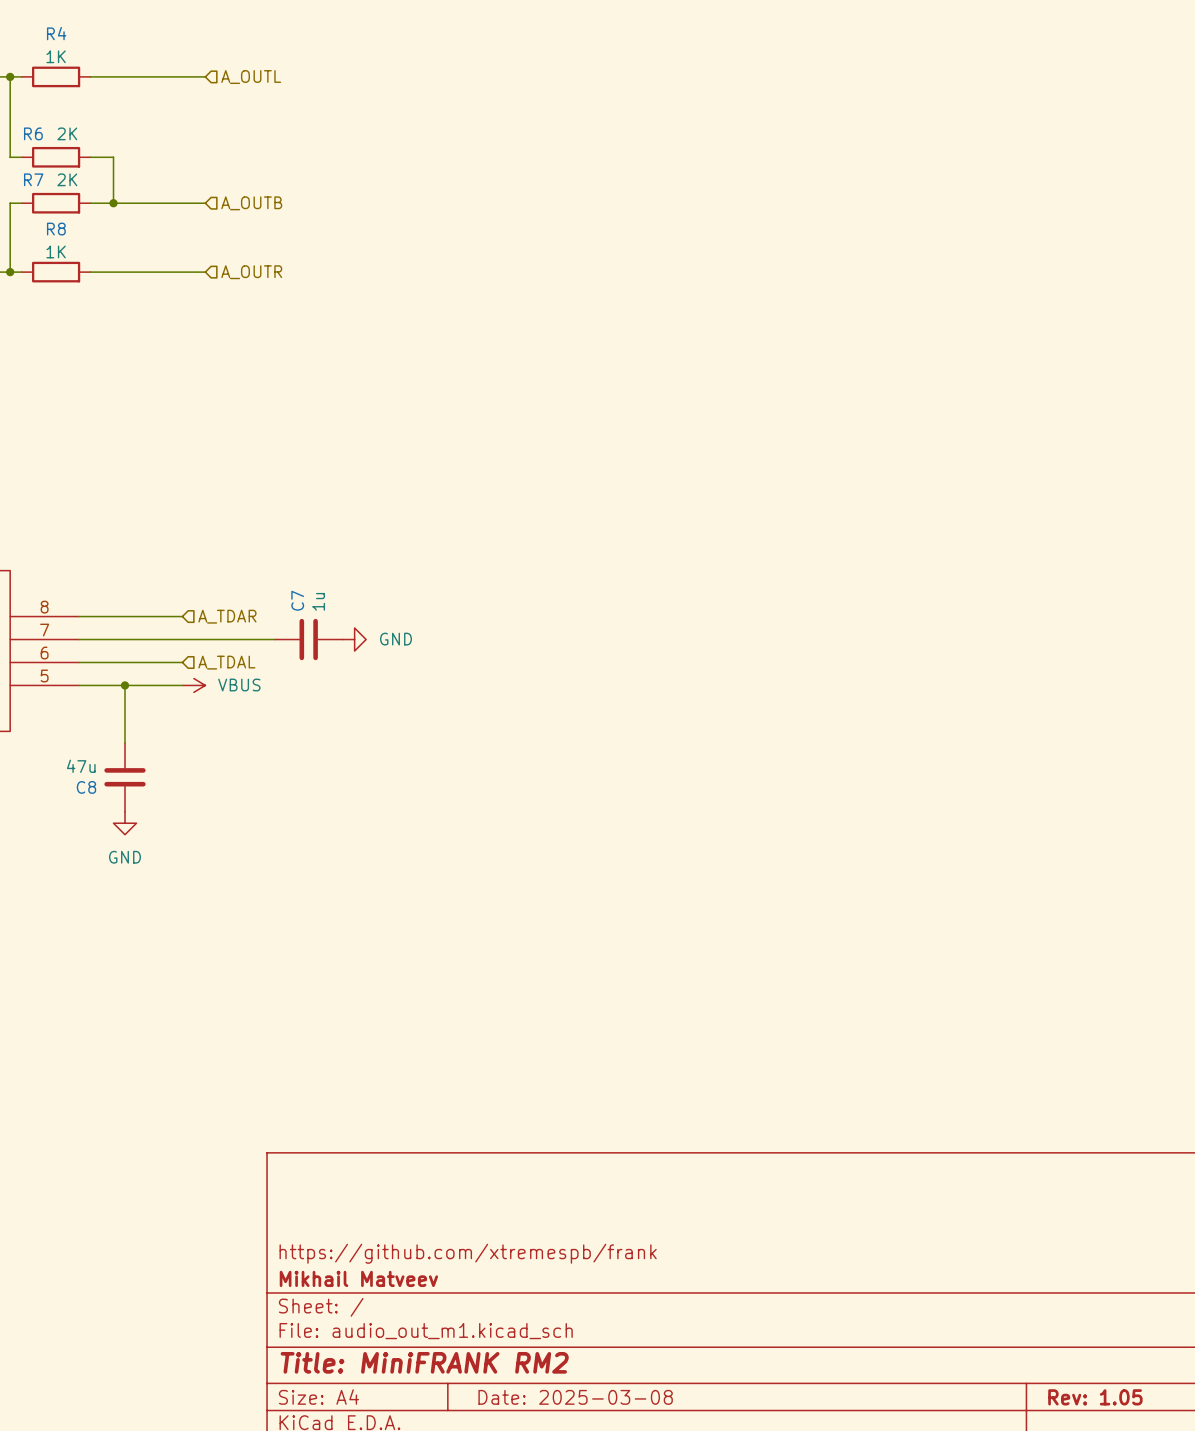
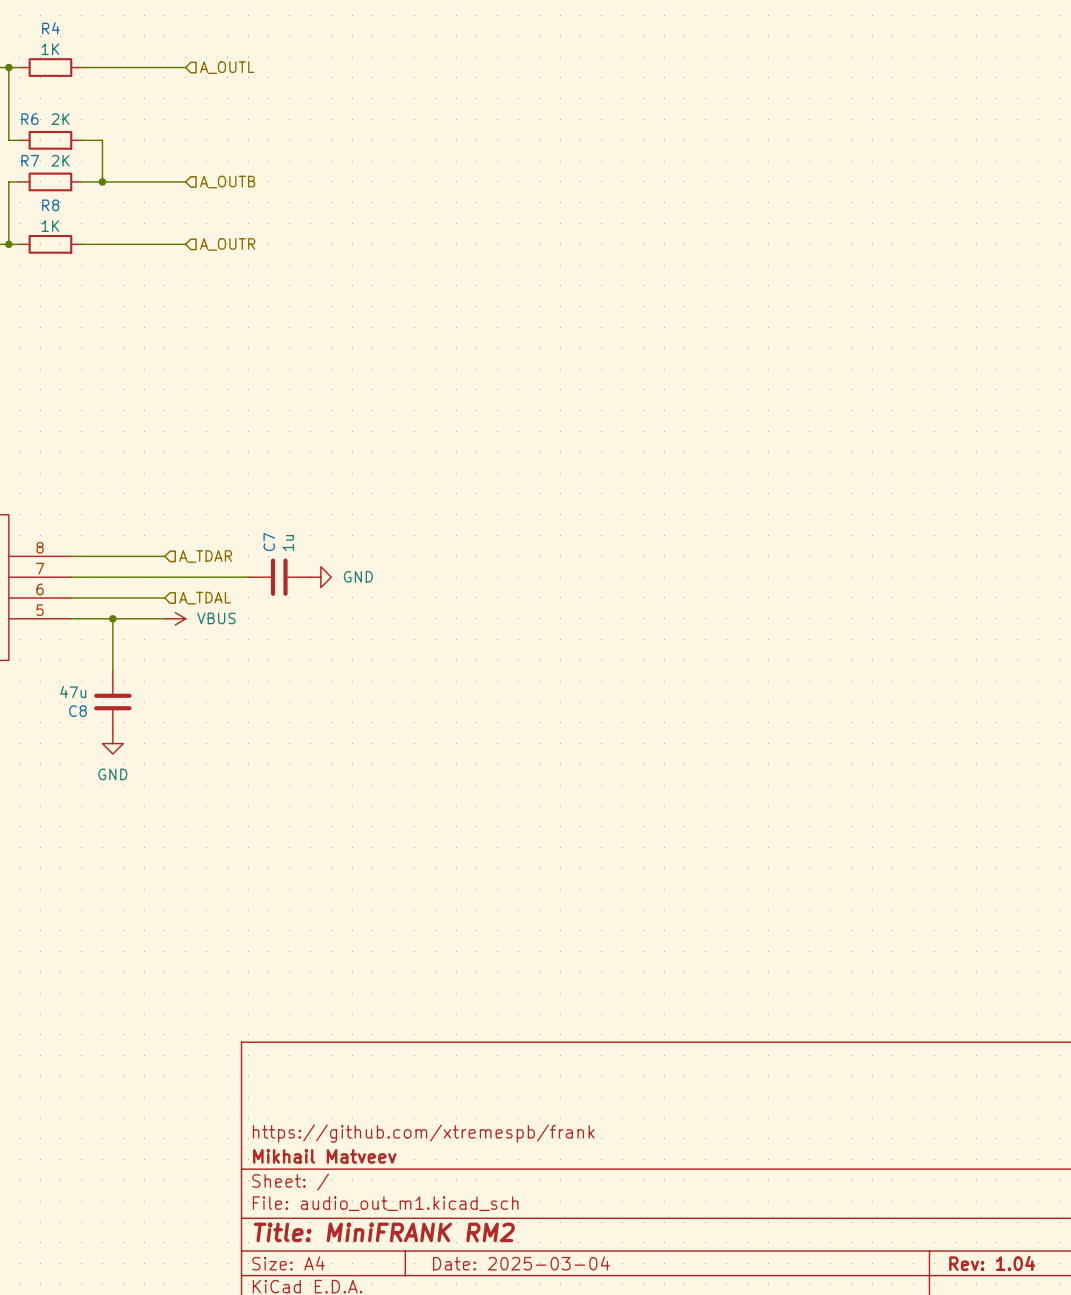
title block: Date: 2025-03-08 (575, 1397) -> Date: 2025-03-04 (521, 1263)
title block: Rev: 1.05 (1095, 1397) -> Rev: 1.04 (992, 1263)

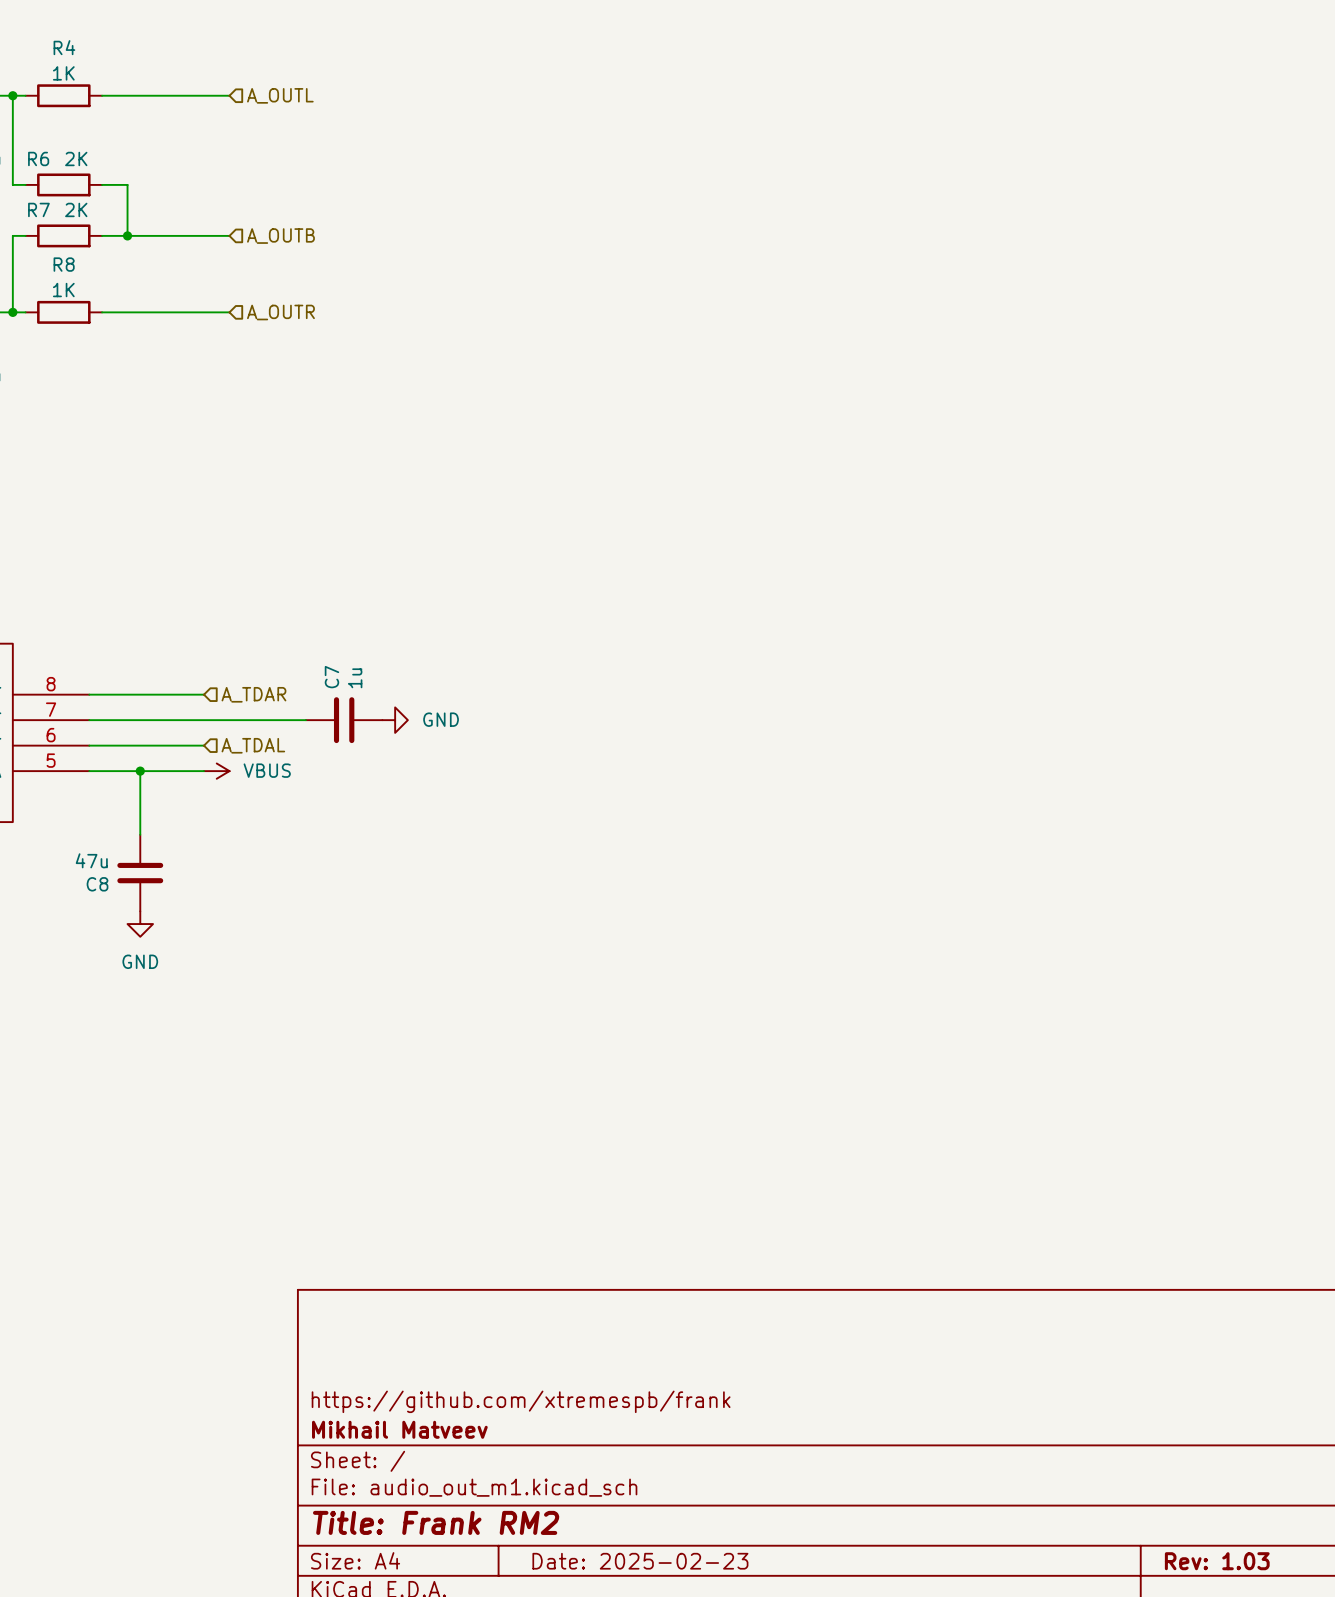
title block: Title: MiniFRANK RM2 (384, 1232) -> Title: Frank RM2 (436, 1522)
title block: Date: 2025-03-04 (521, 1263) -> Date: 2025-02-23 (640, 1561)
title block: Rev: 1.04 (992, 1263) -> Rev: 1.03 (1217, 1561)

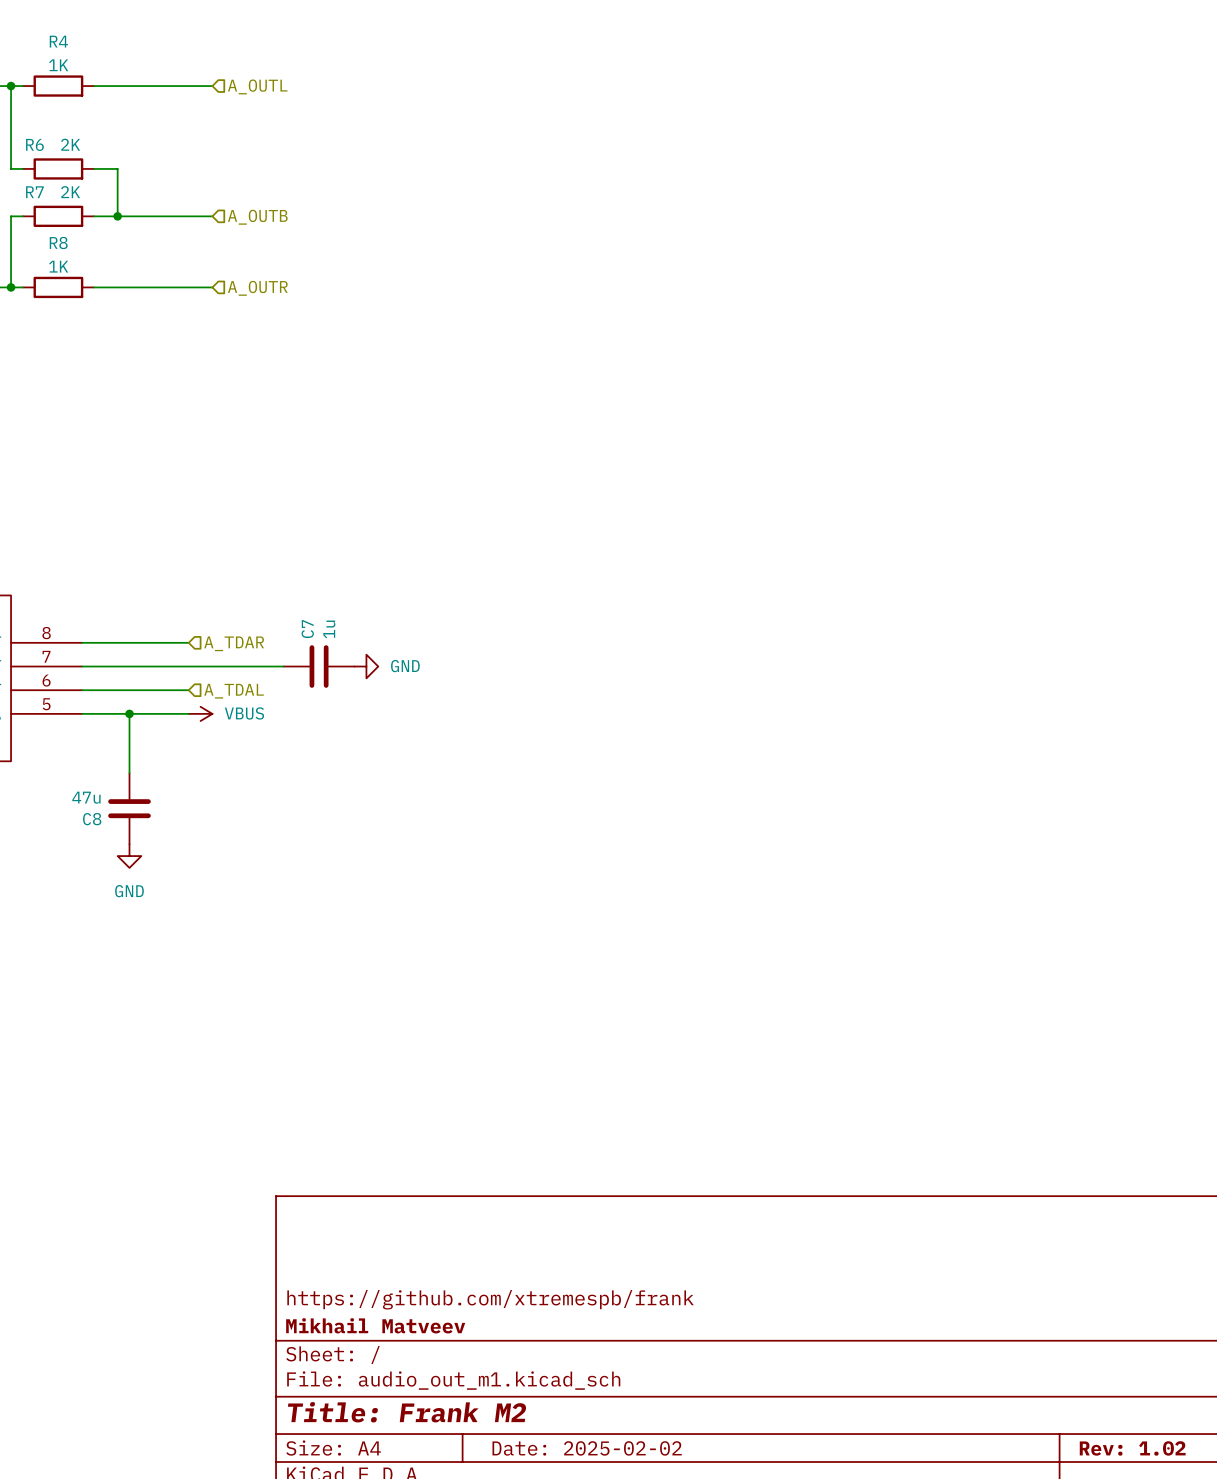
title block: Title: Frank RM2 (436, 1522) -> Title: Frank M2 (407, 1412)
title block: Date: 2025-02-23 (640, 1561) -> Date: 2025-02-02 (587, 1448)
title block: Rev: 1.03 (1217, 1561) -> Rev: 1.02 (1132, 1448)

